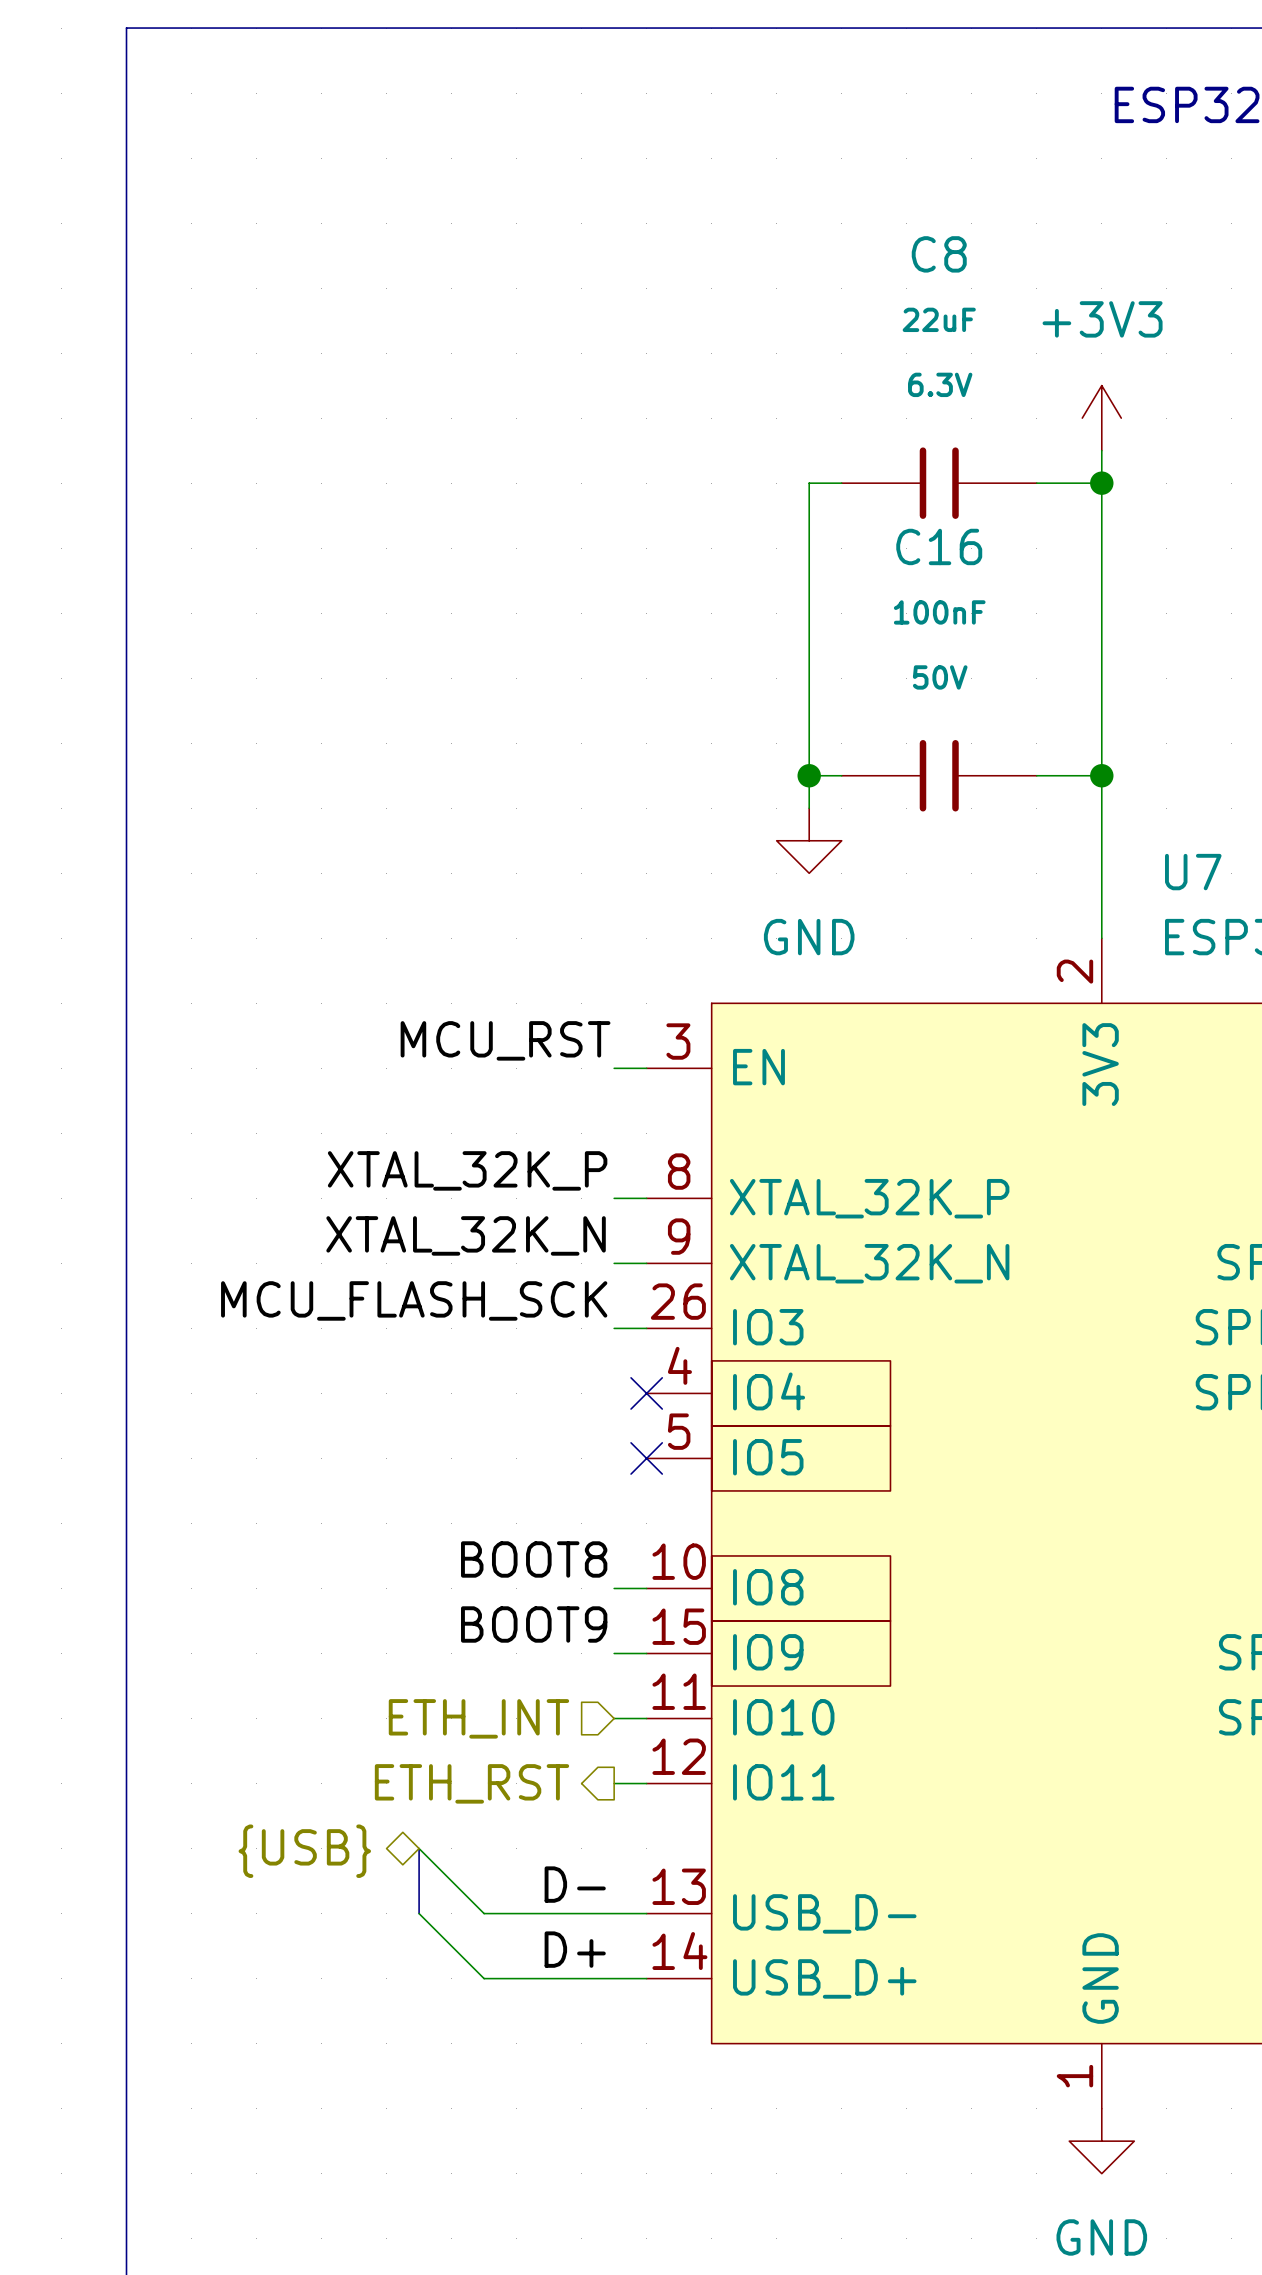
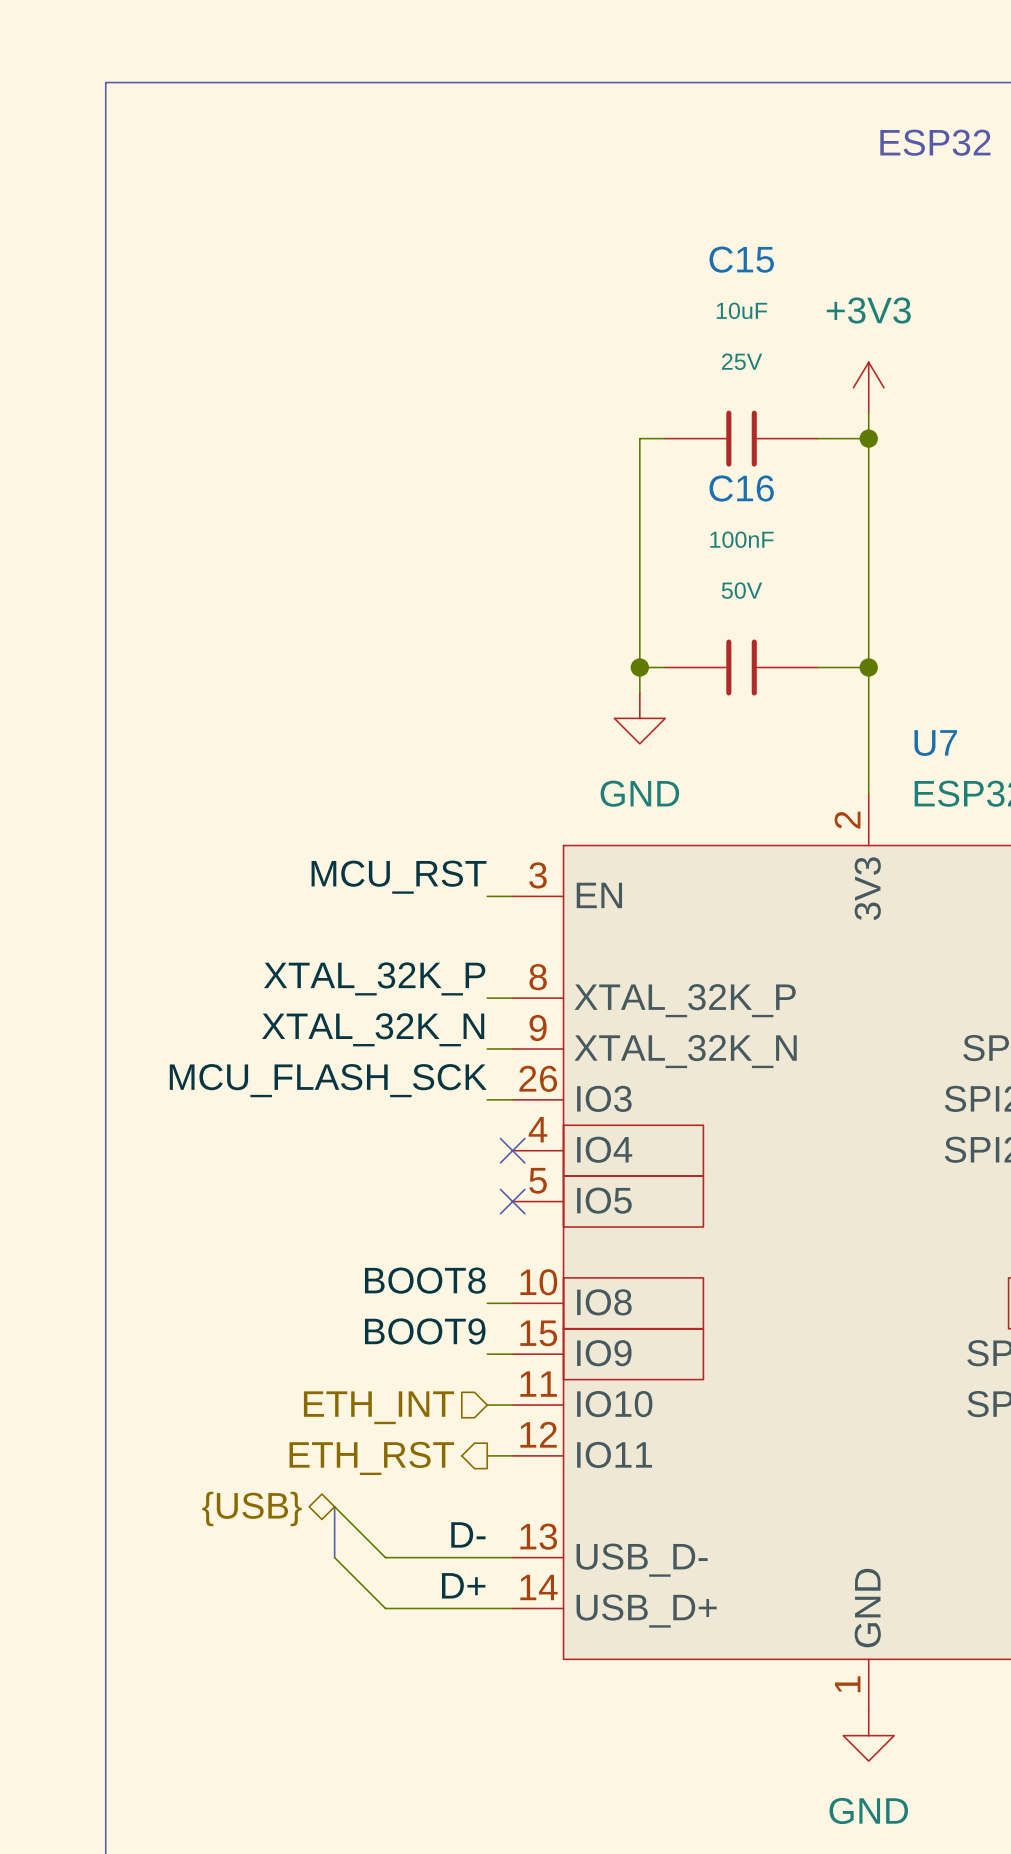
C8 name: C8 (939, 254) -> C15 (741, 259)
C8 value: 22uF (939, 319) -> 10uF (741, 310)
C8 text: 6.3V (940, 384) -> 25V (742, 361)

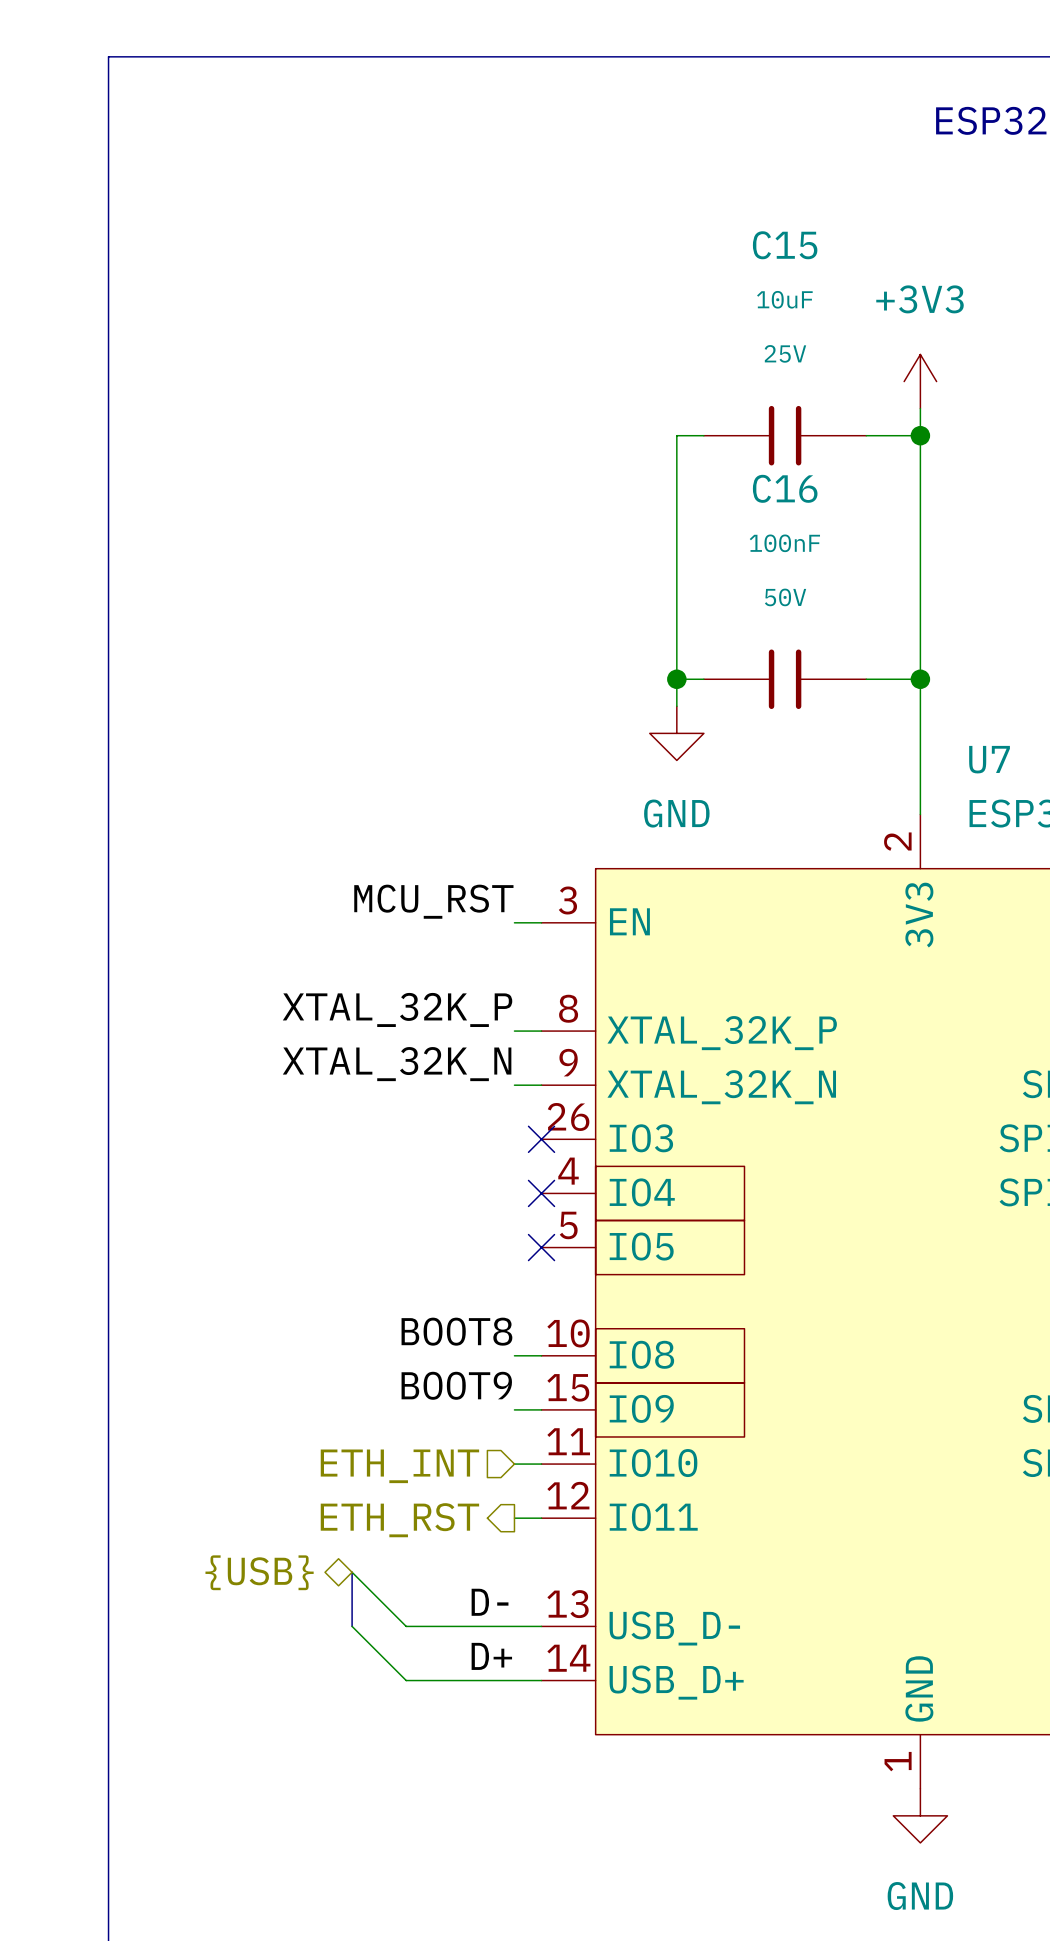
label: MCU_FLASH_SCK (328, 1080) -> none
wire: (487, 1099) (512, 1099) -> none
no-connect mark: none -> (541, 1139)

